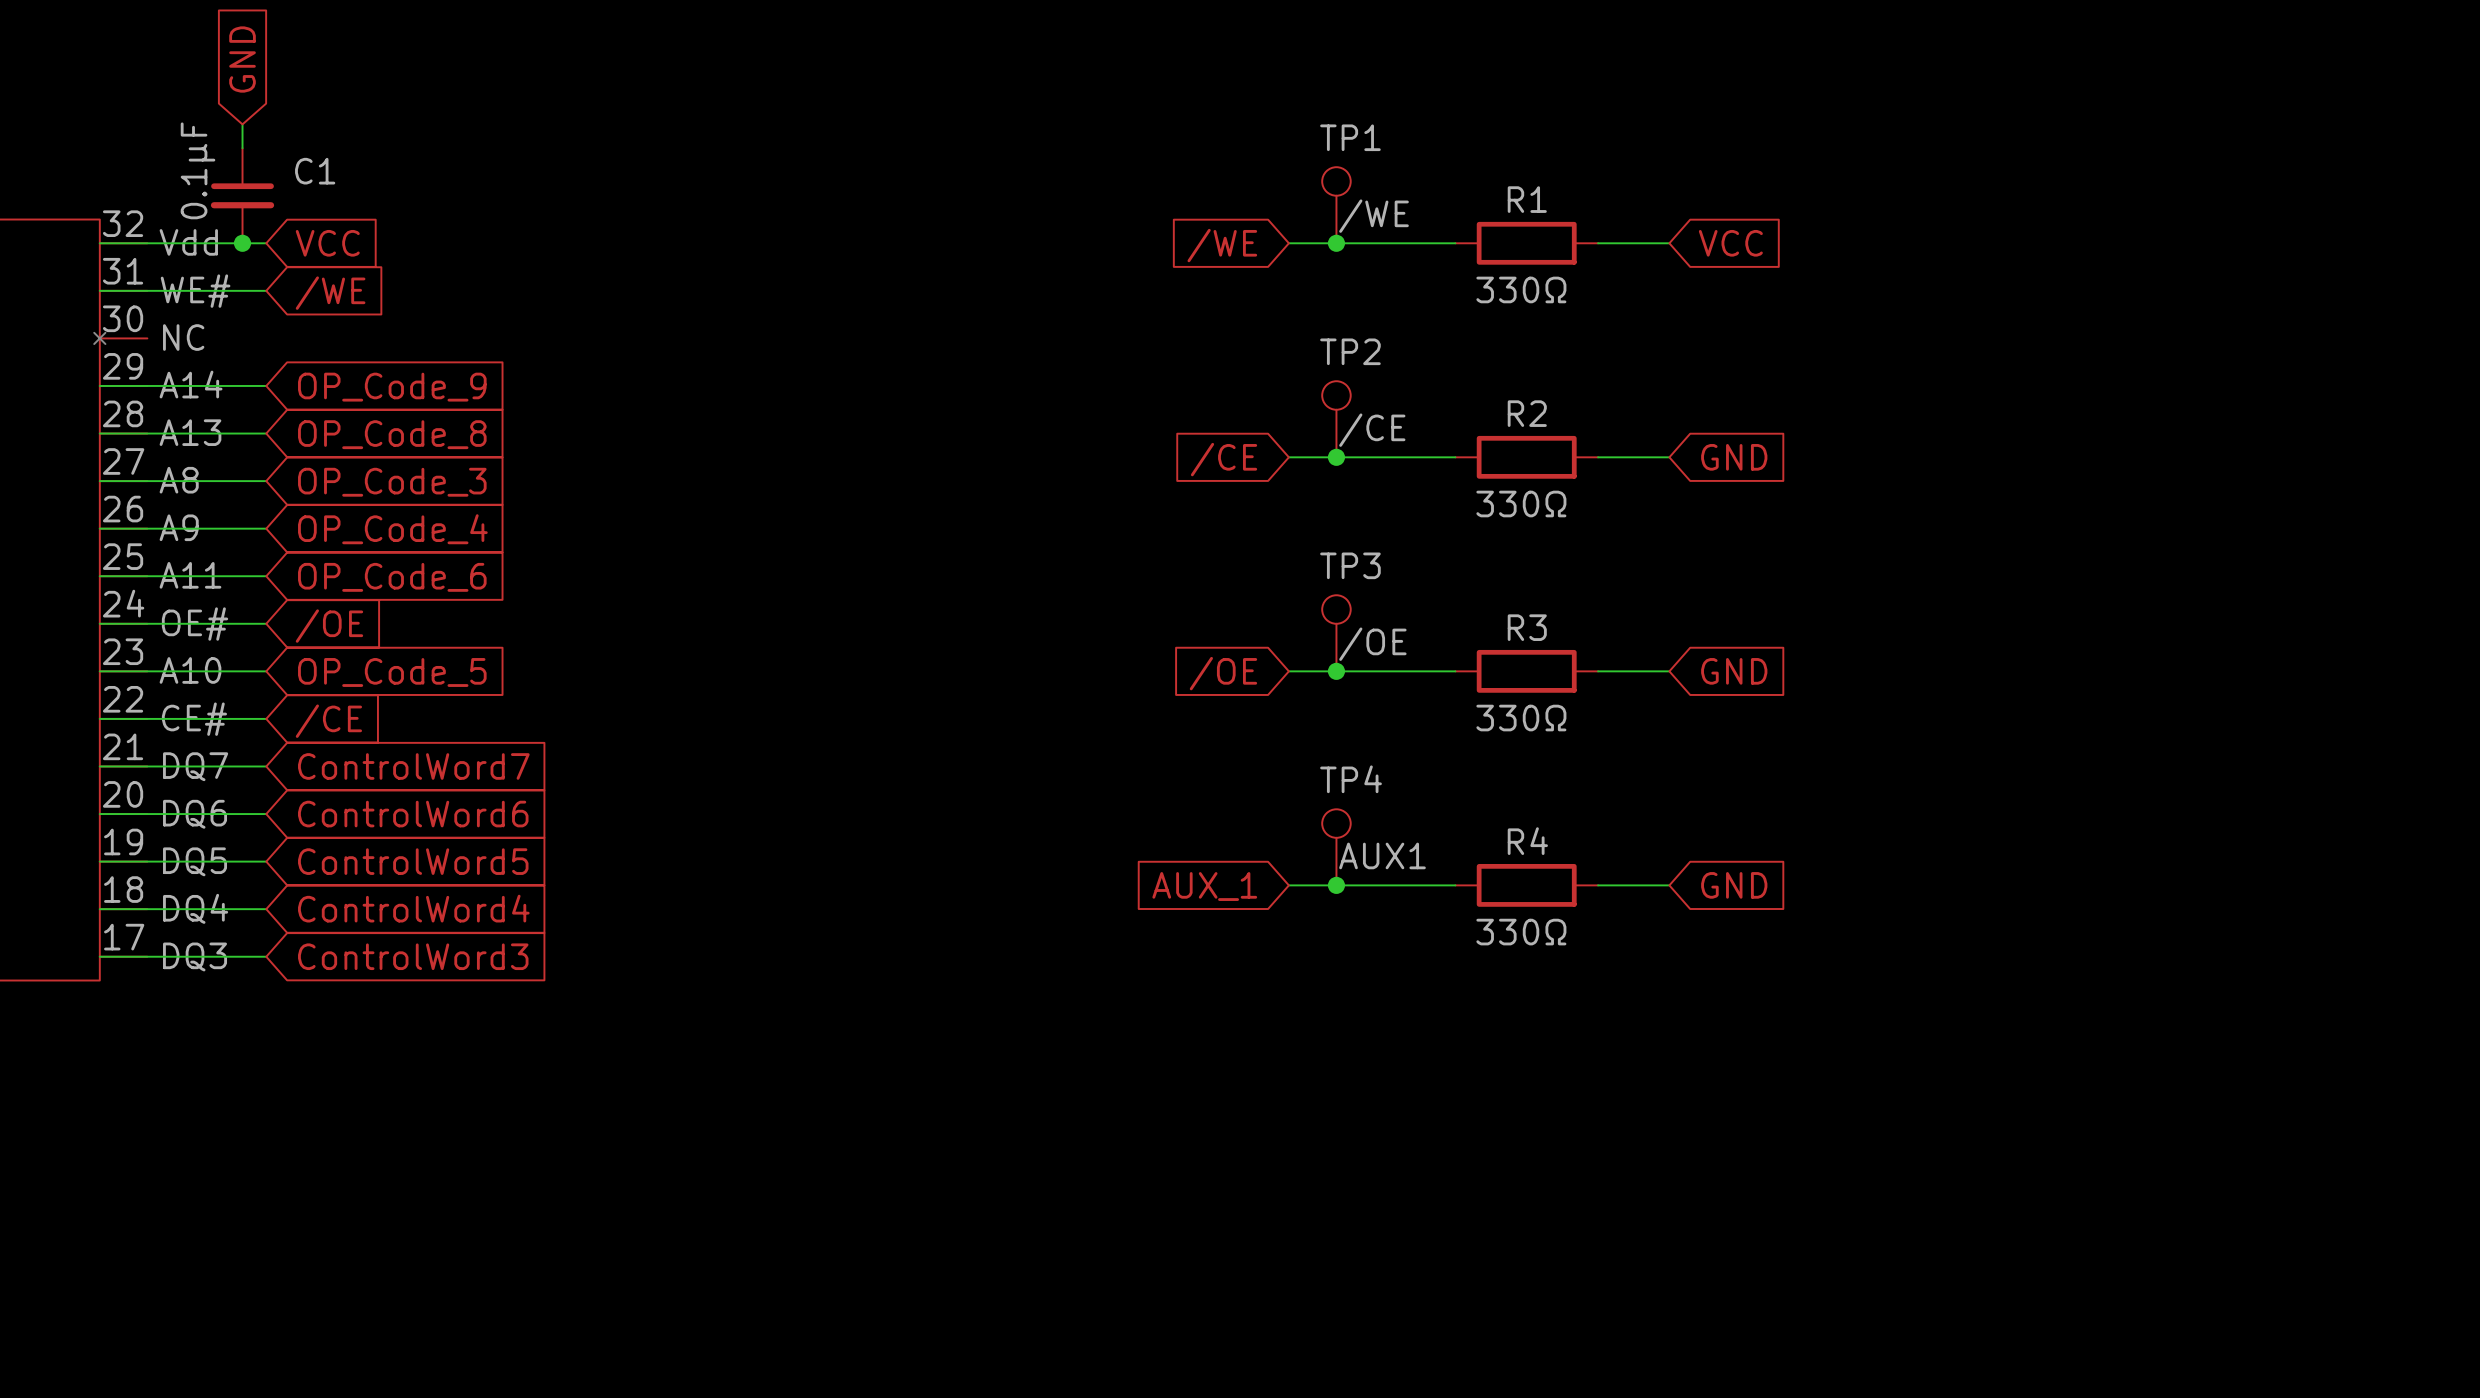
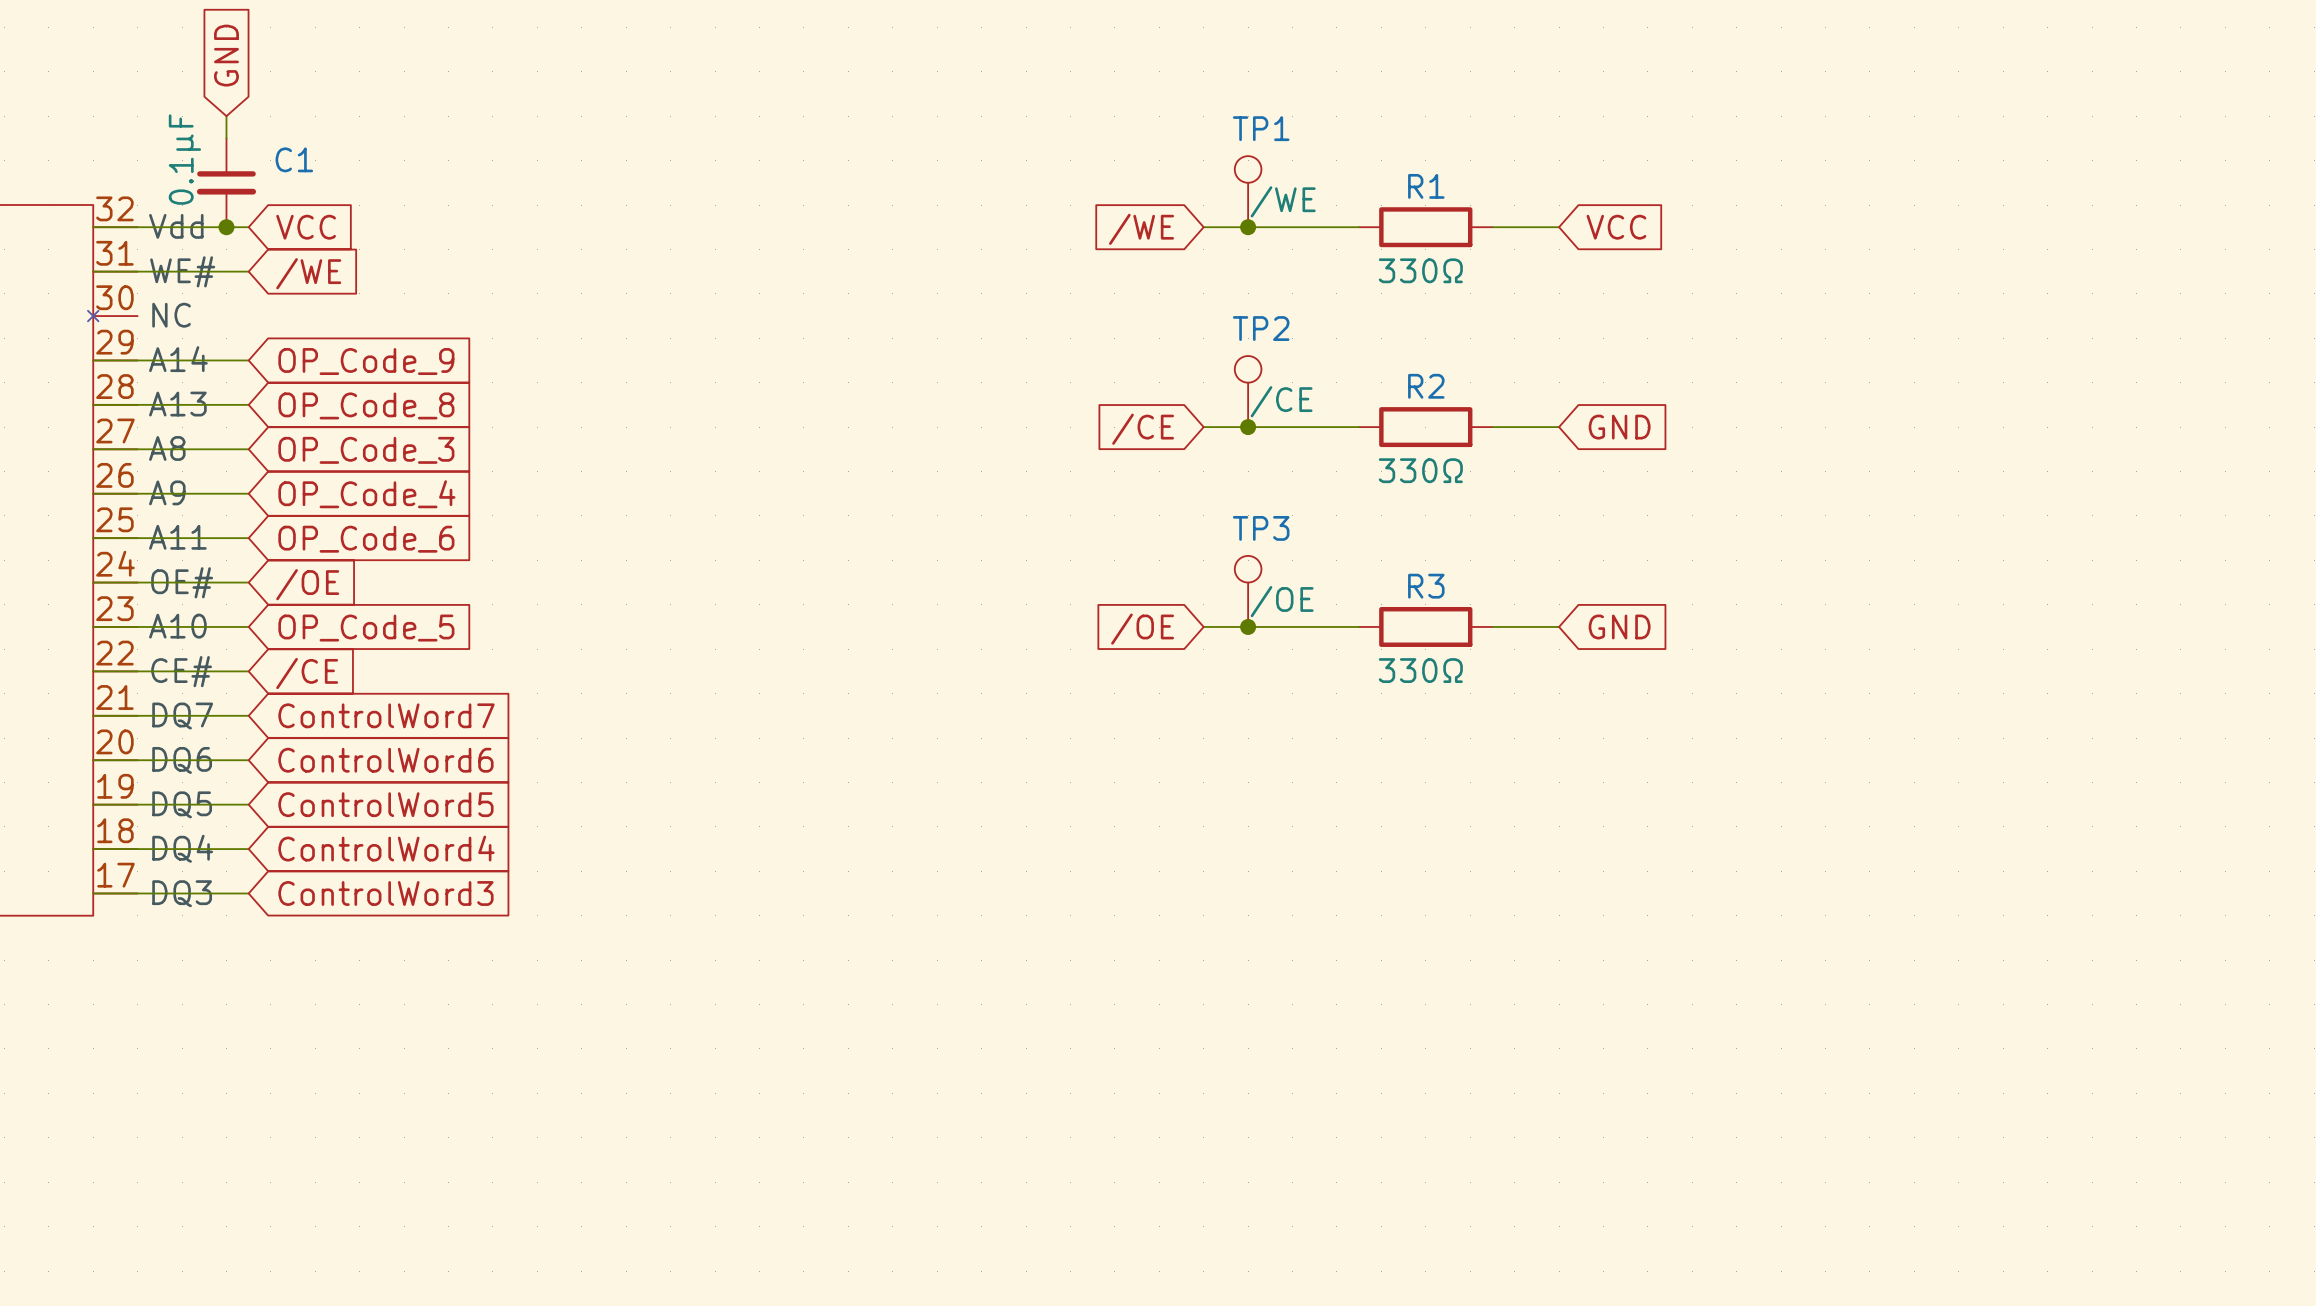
TP4: AUX1 (1336, 847) -> none
wire: (1288, 885) (1455, 885) -> none
junction: (1336, 885) -> none
R4: 330Ω (1526, 885) -> none
wire: (1598, 885) (1669, 885) -> none
global label: GND (1734, 885) -> none
global label: AUX_1 (1204, 886) -> none

